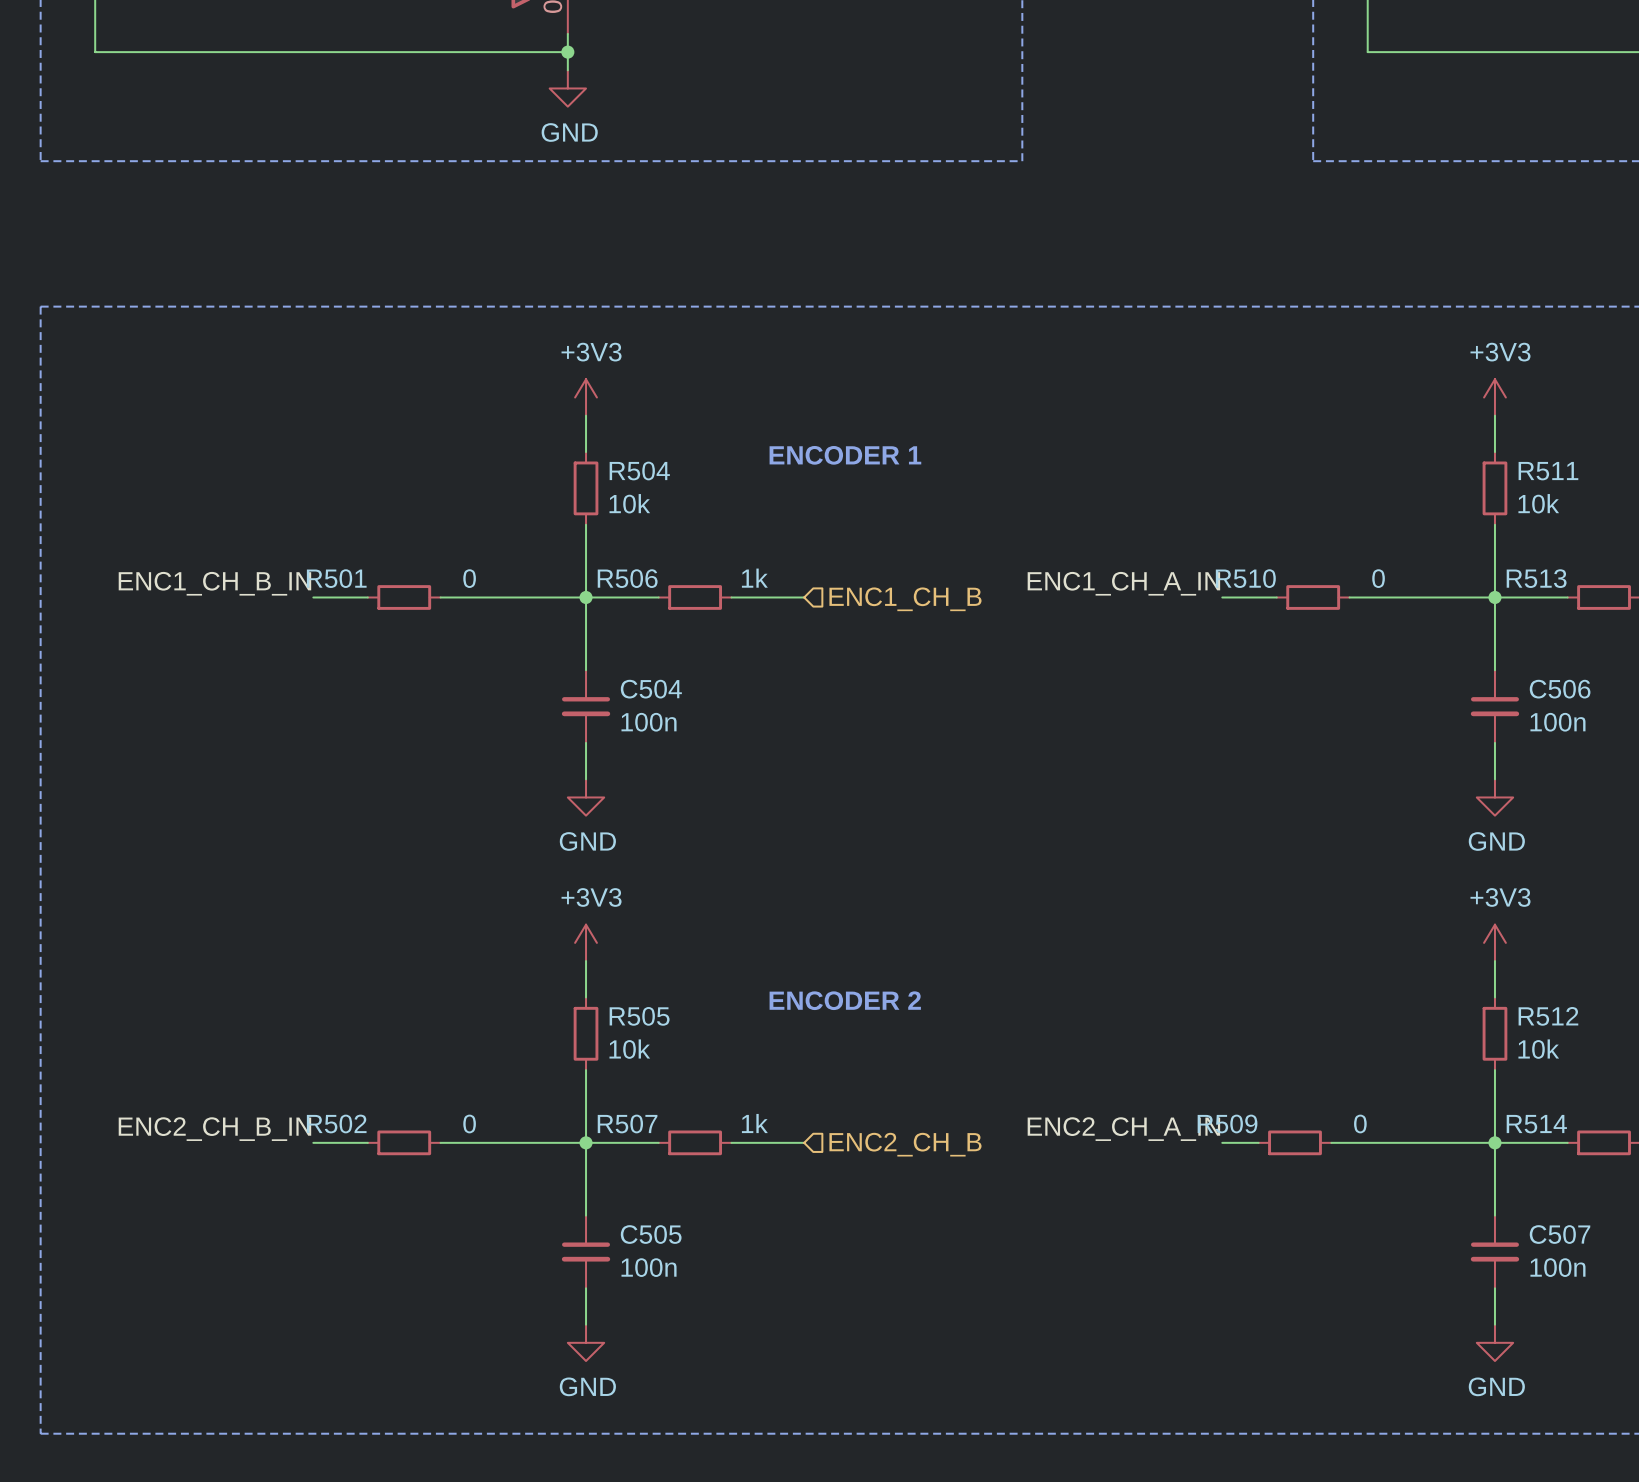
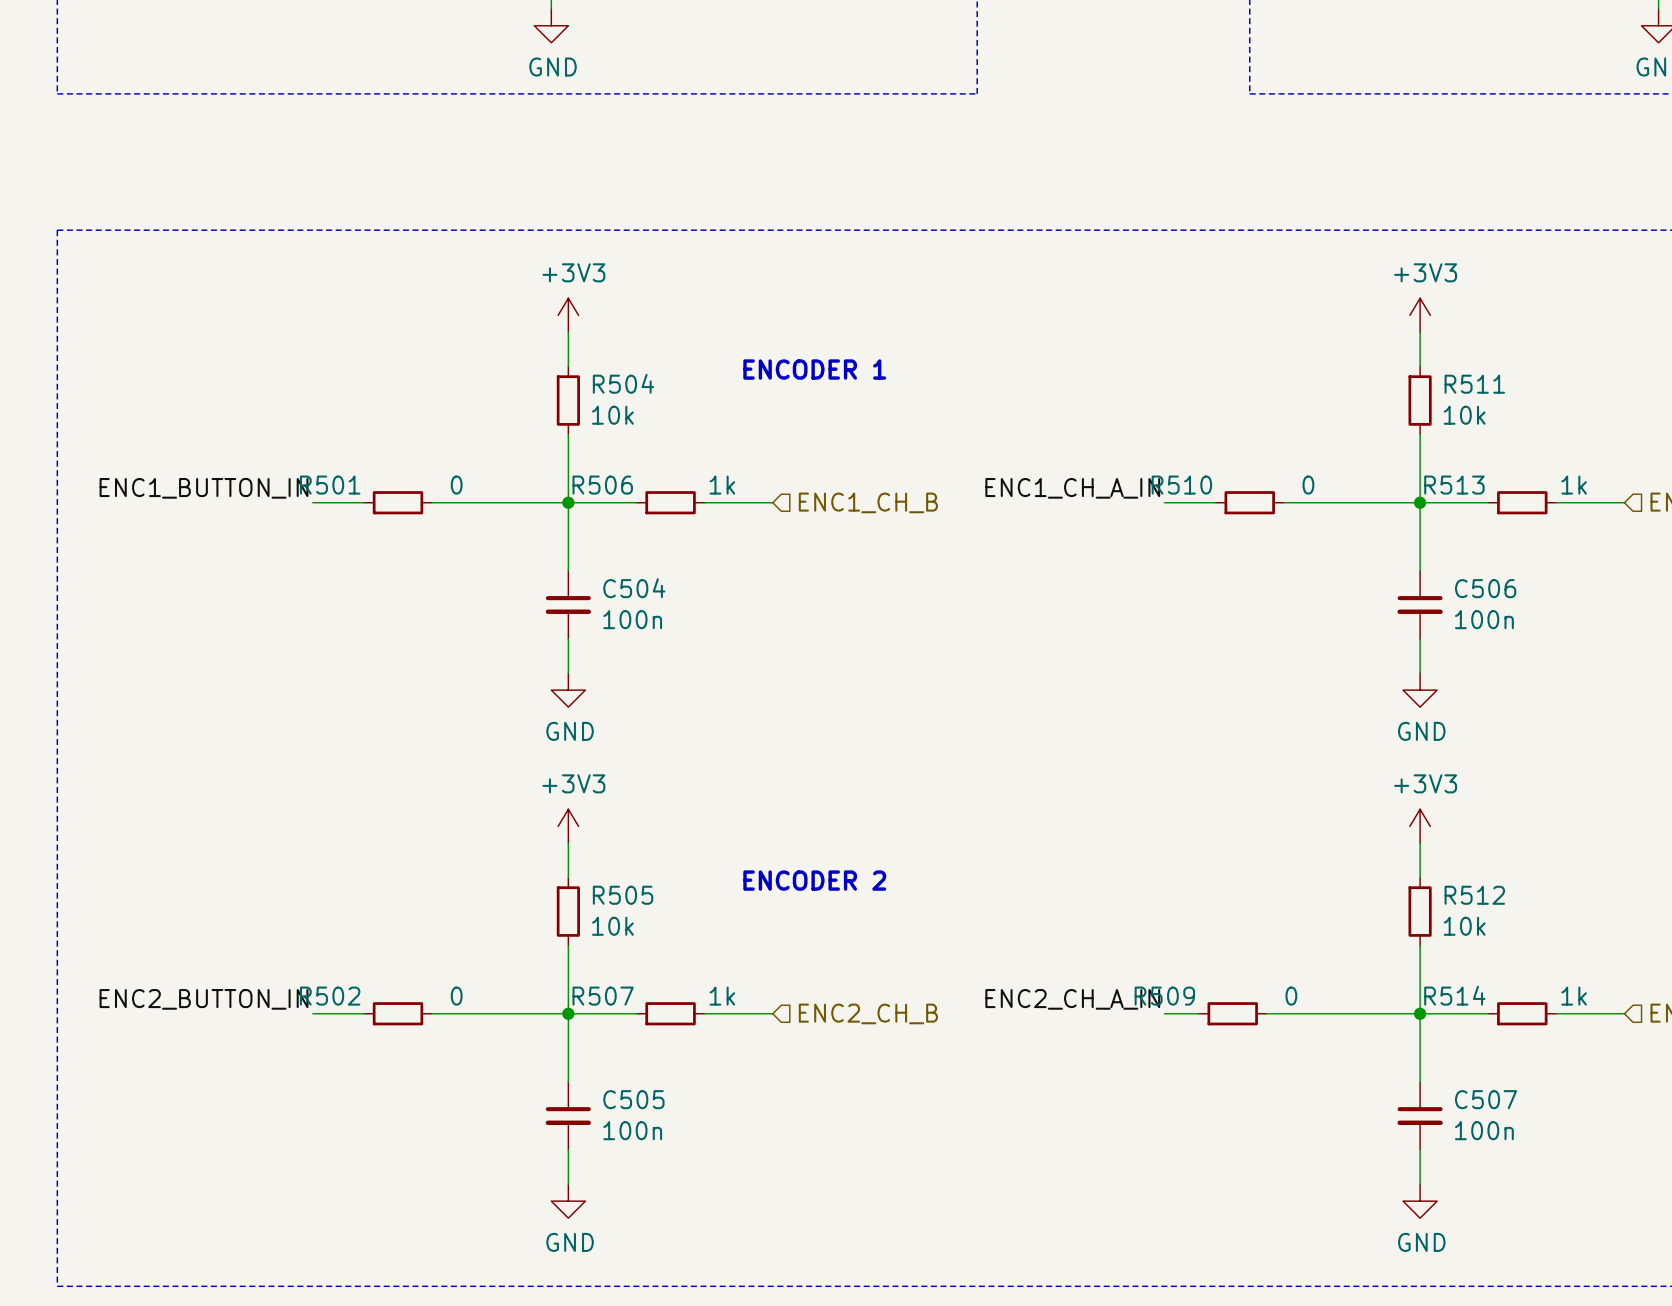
label: ENC1_CH_B_IN (214, 583) -> ENC1_BUTTON_IN (204, 488)
label: ENC2_CH_B_IN (214, 1129) -> ENC2_BUTTON_IN (204, 999)

